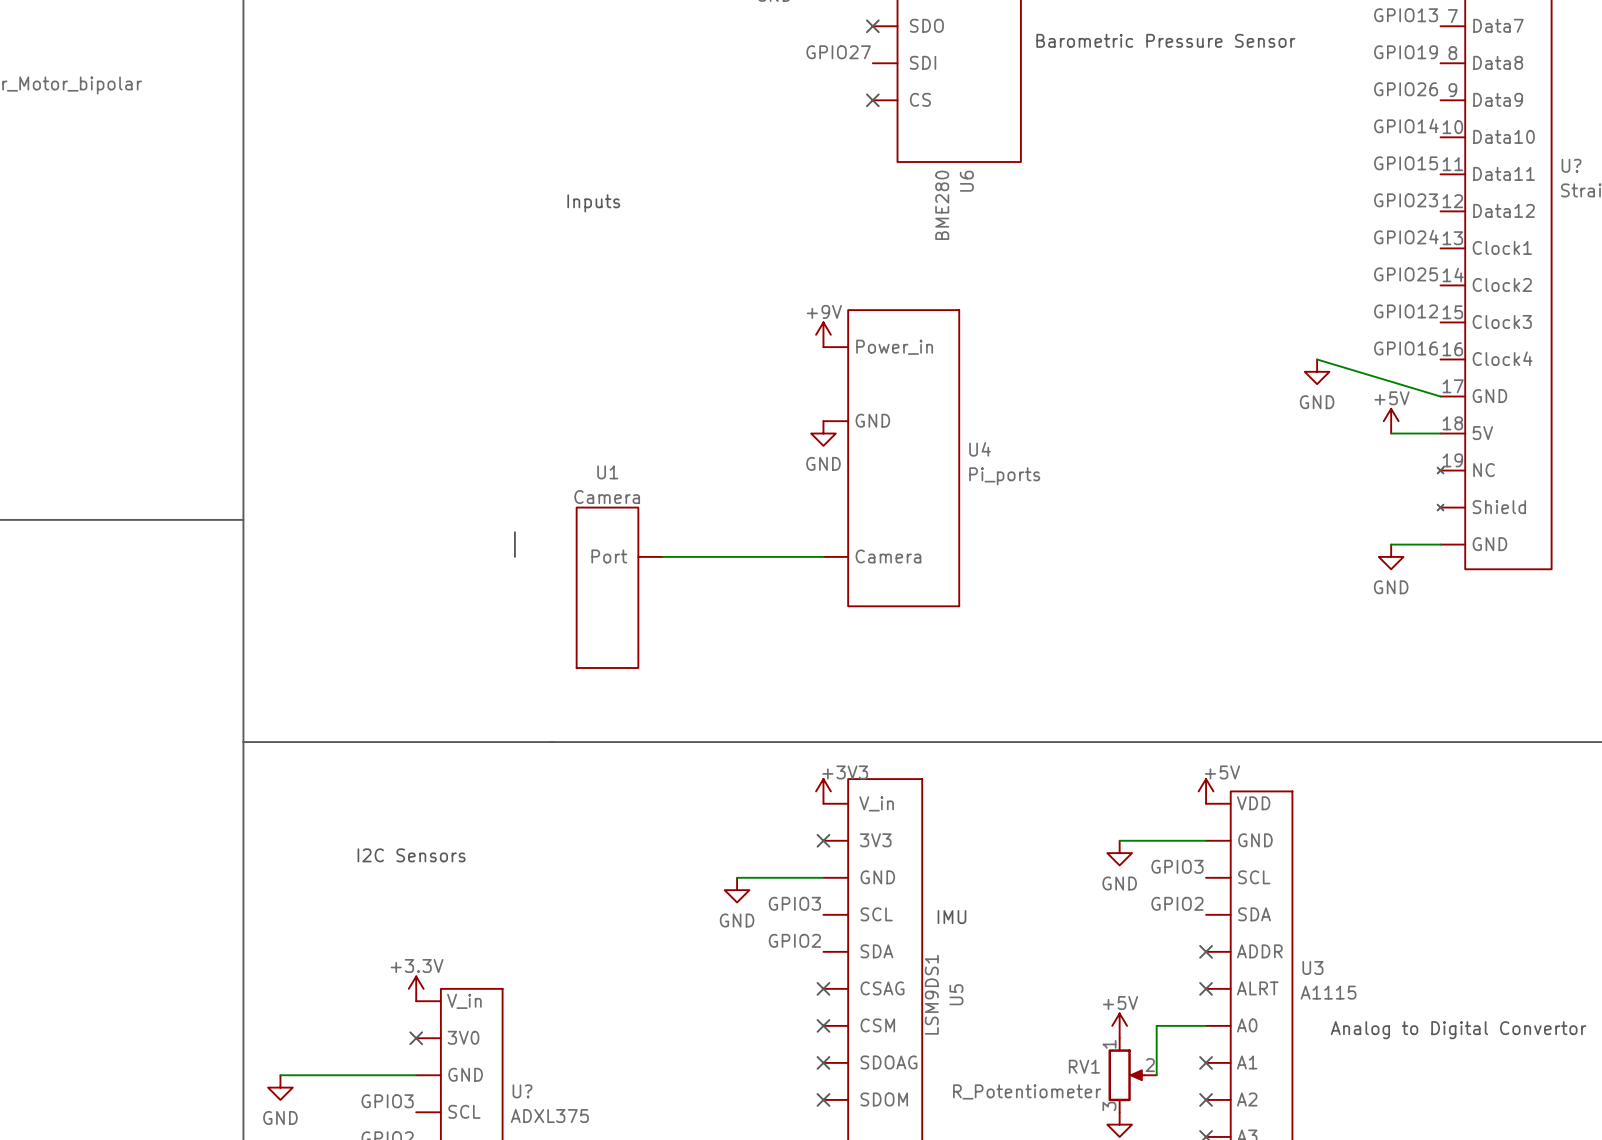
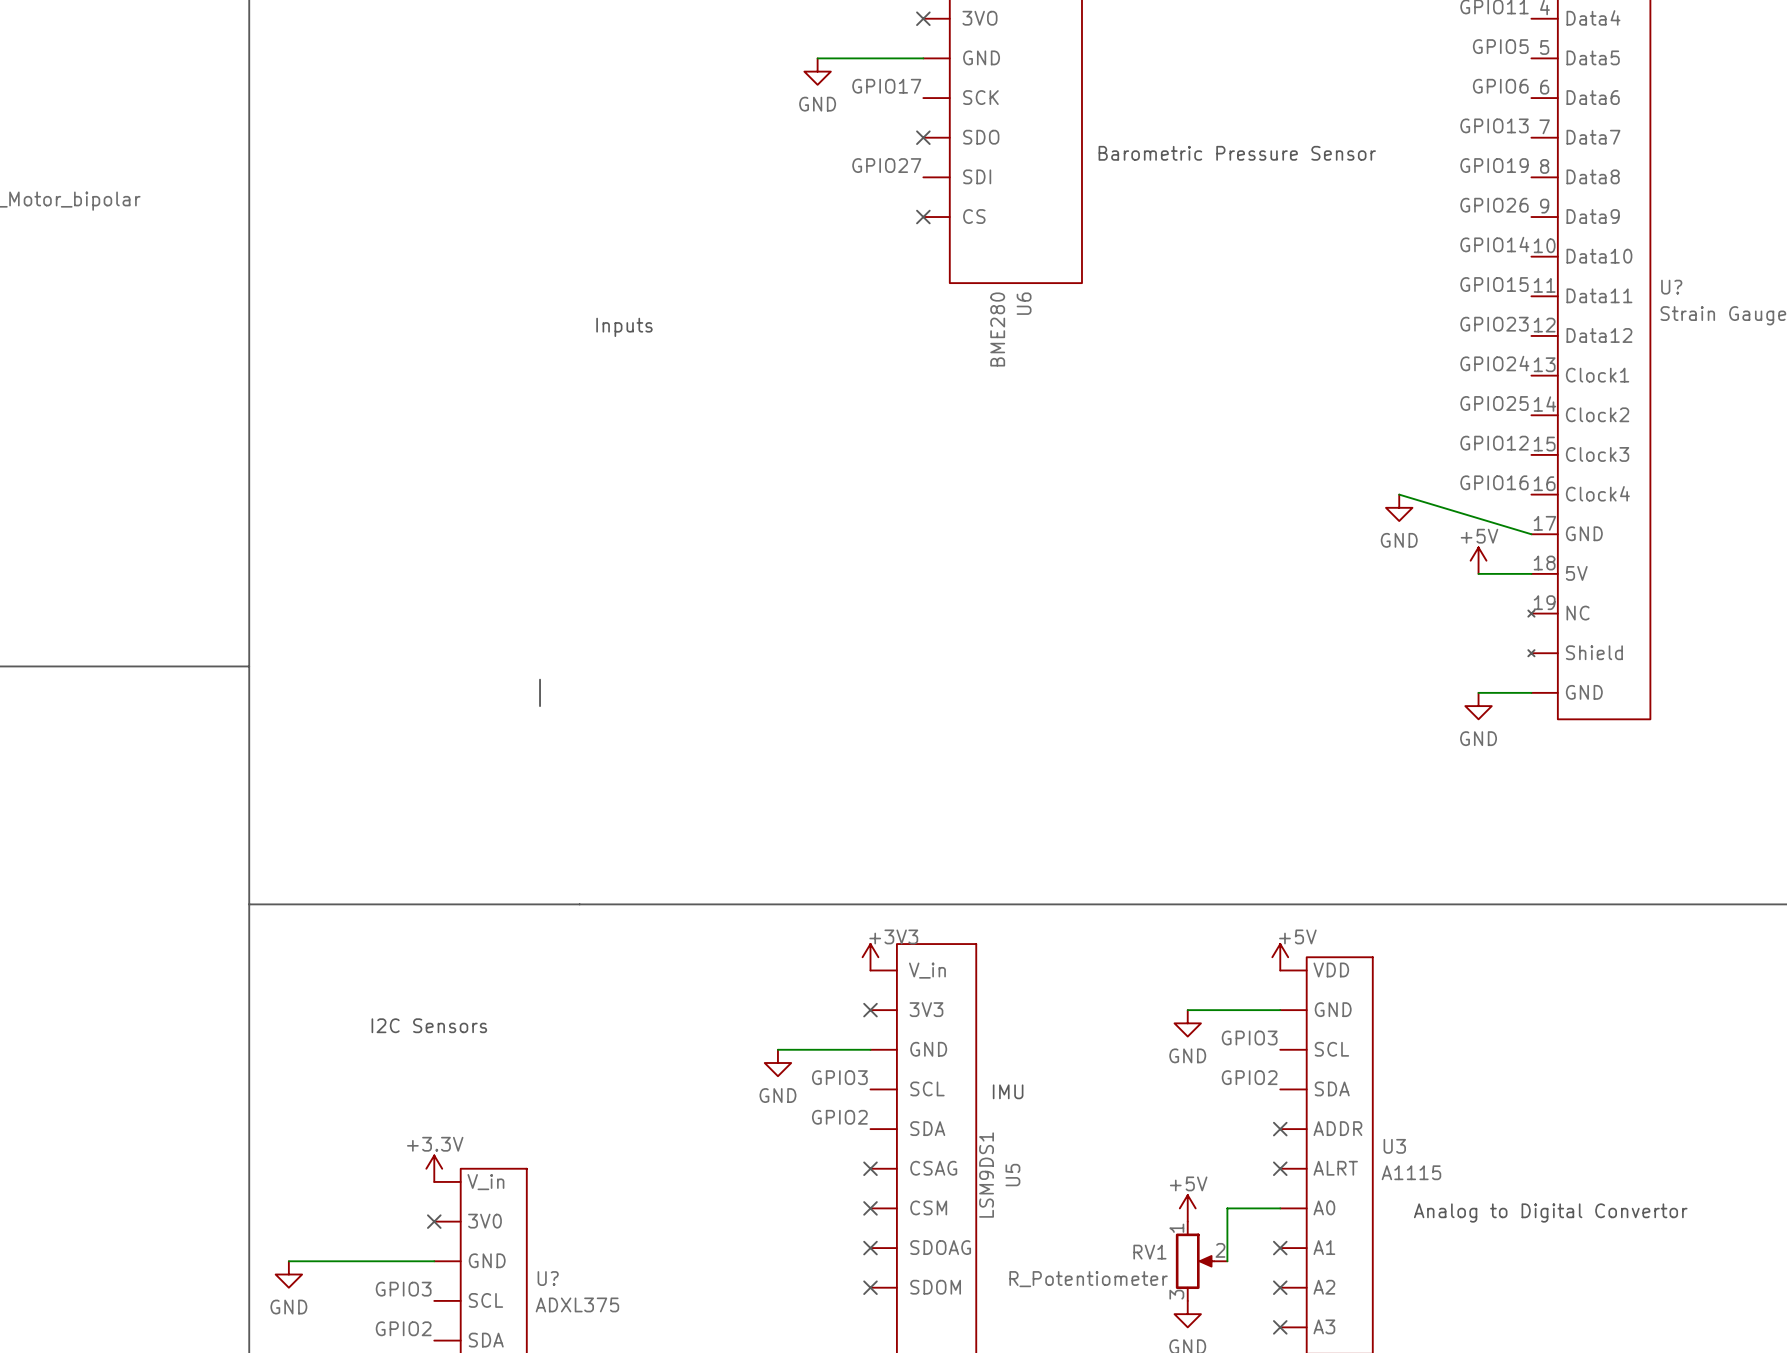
power symbol: +9V (823, 334) -> none
power symbol: GND (823, 433) -> none
U4: Pi_ports (891, 458) -> none
wire: (663, 556) (823, 556) -> none
U1: Camera (619, 587) -> none

